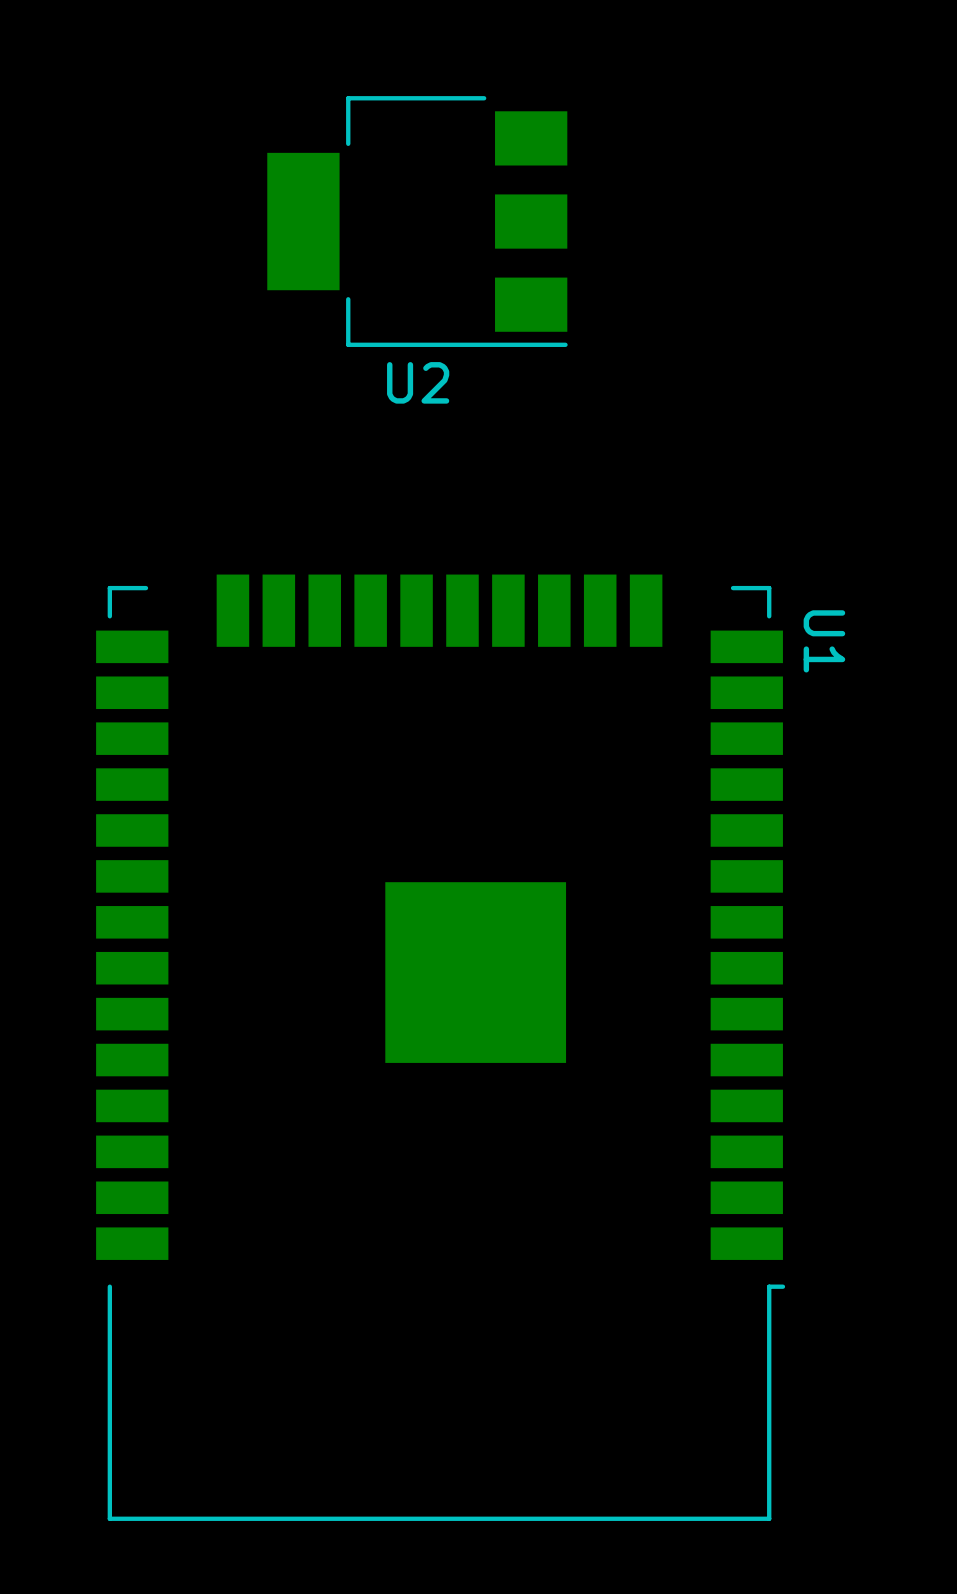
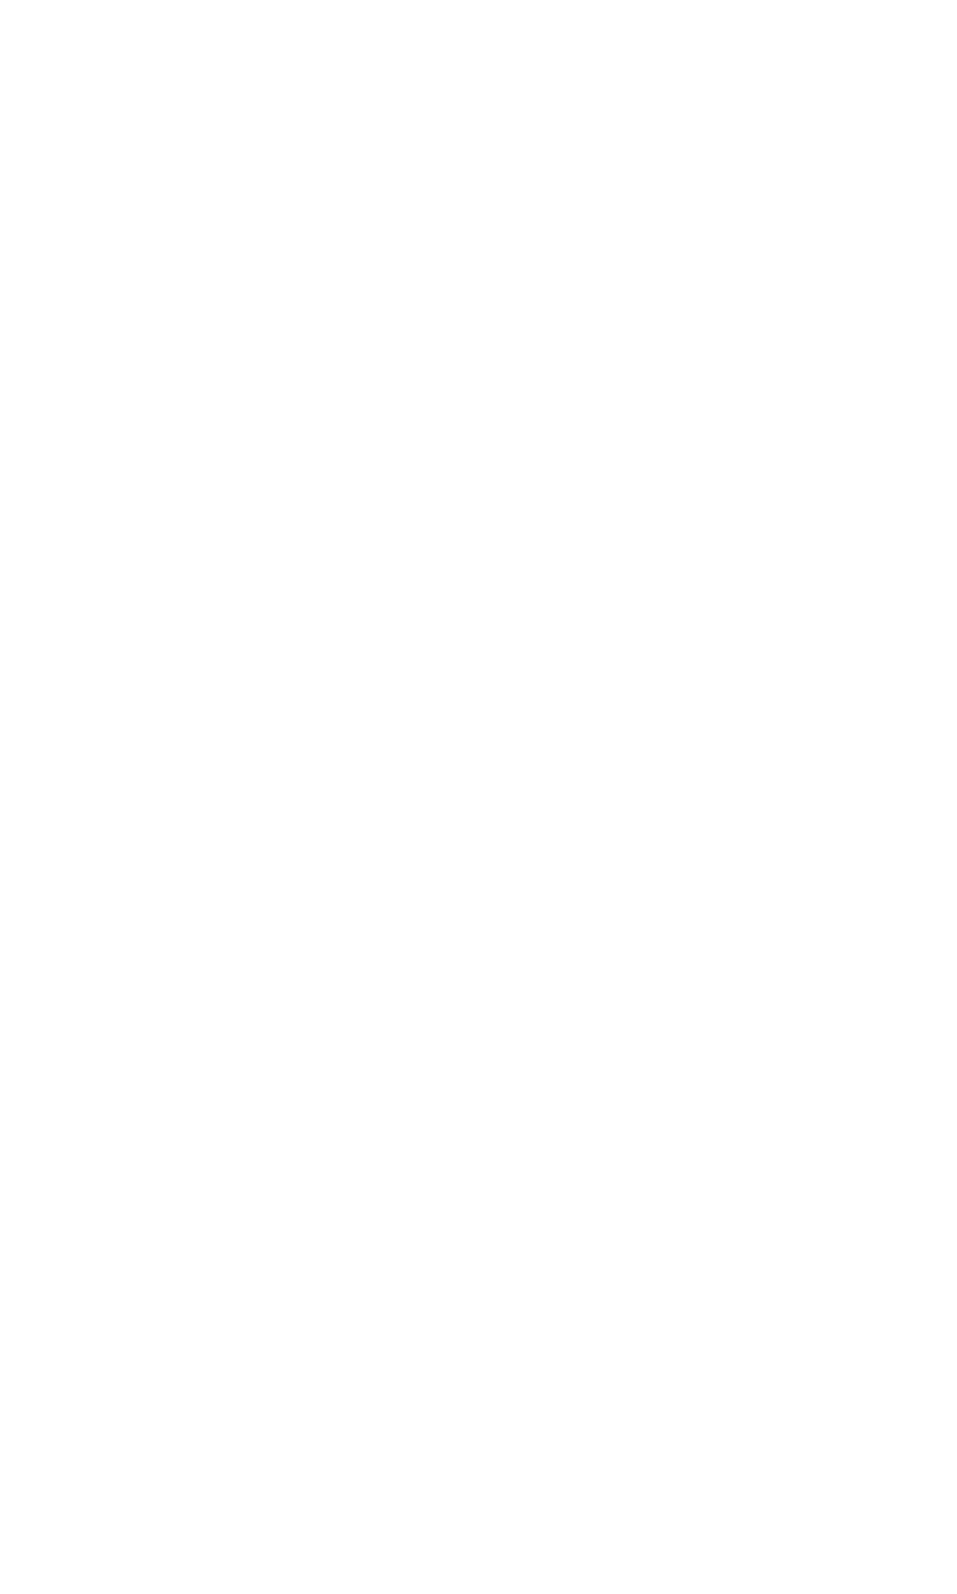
U2: (417, 221) -> none
U1: (440, 1047) -> none

